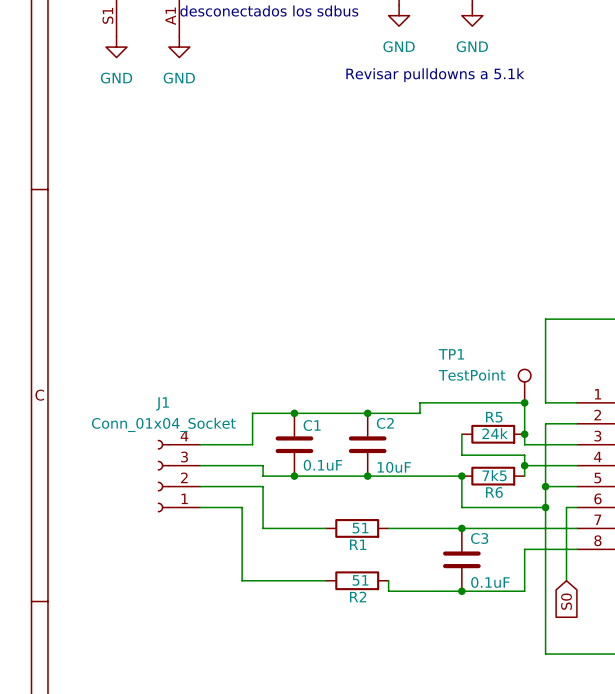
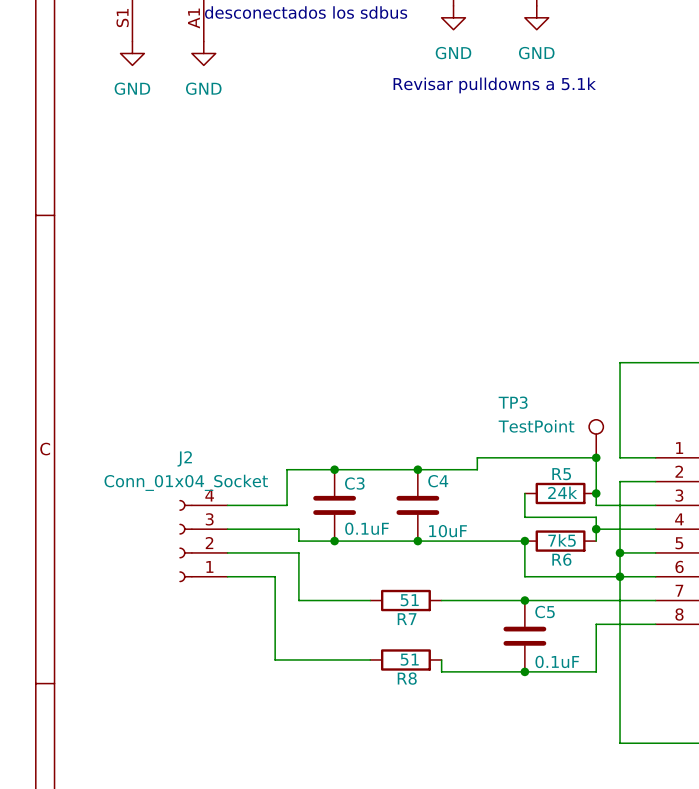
TP1 name: TP1 (451, 354) -> TP3 (513, 402)
J1 name: J1 (162, 403) -> J2 (184, 458)
C2 name: C2 (385, 423) -> C4 (438, 481)
C1 name: C1 (312, 425) -> C3 (354, 483)
wire: (566, 507) (566, 580) -> (643, 576) (620, 576)
C3 name: C3 (479, 538) -> C5 (545, 611)
R1 name: R1 (358, 544) -> R7 (407, 619)
R2 name: R2 (358, 597) -> R8 (407, 678)
global label: S0 (566, 601) -> none

